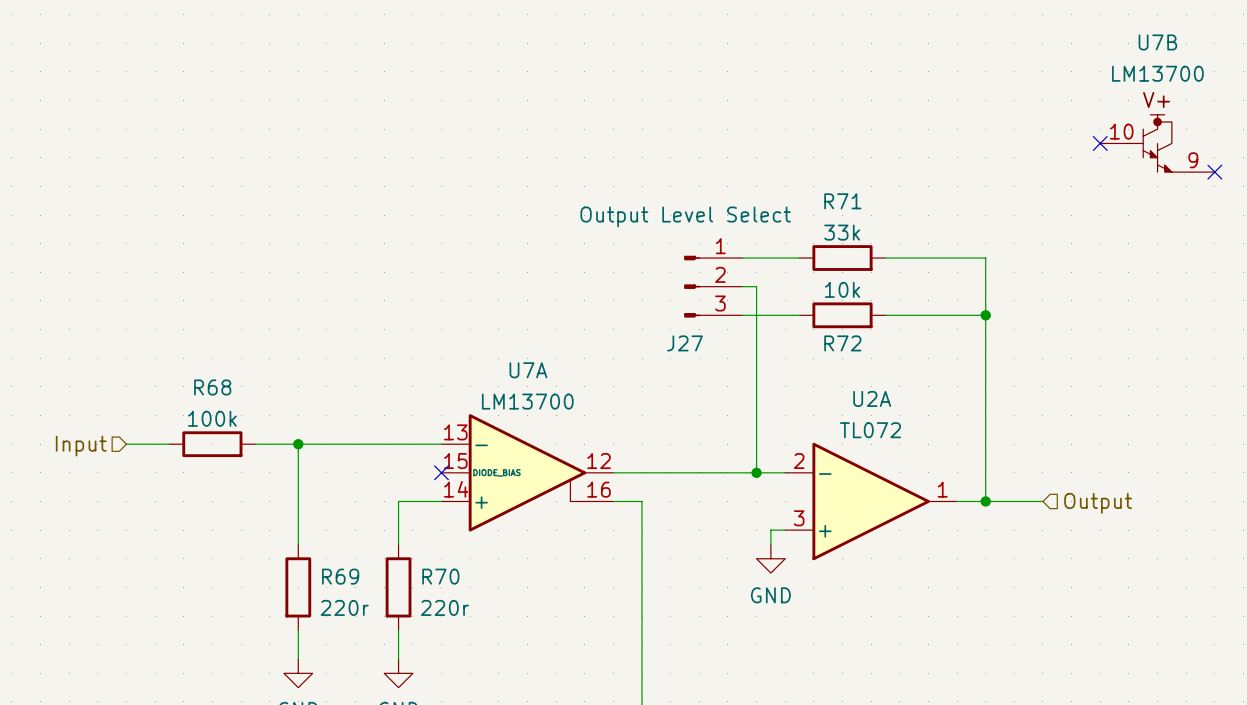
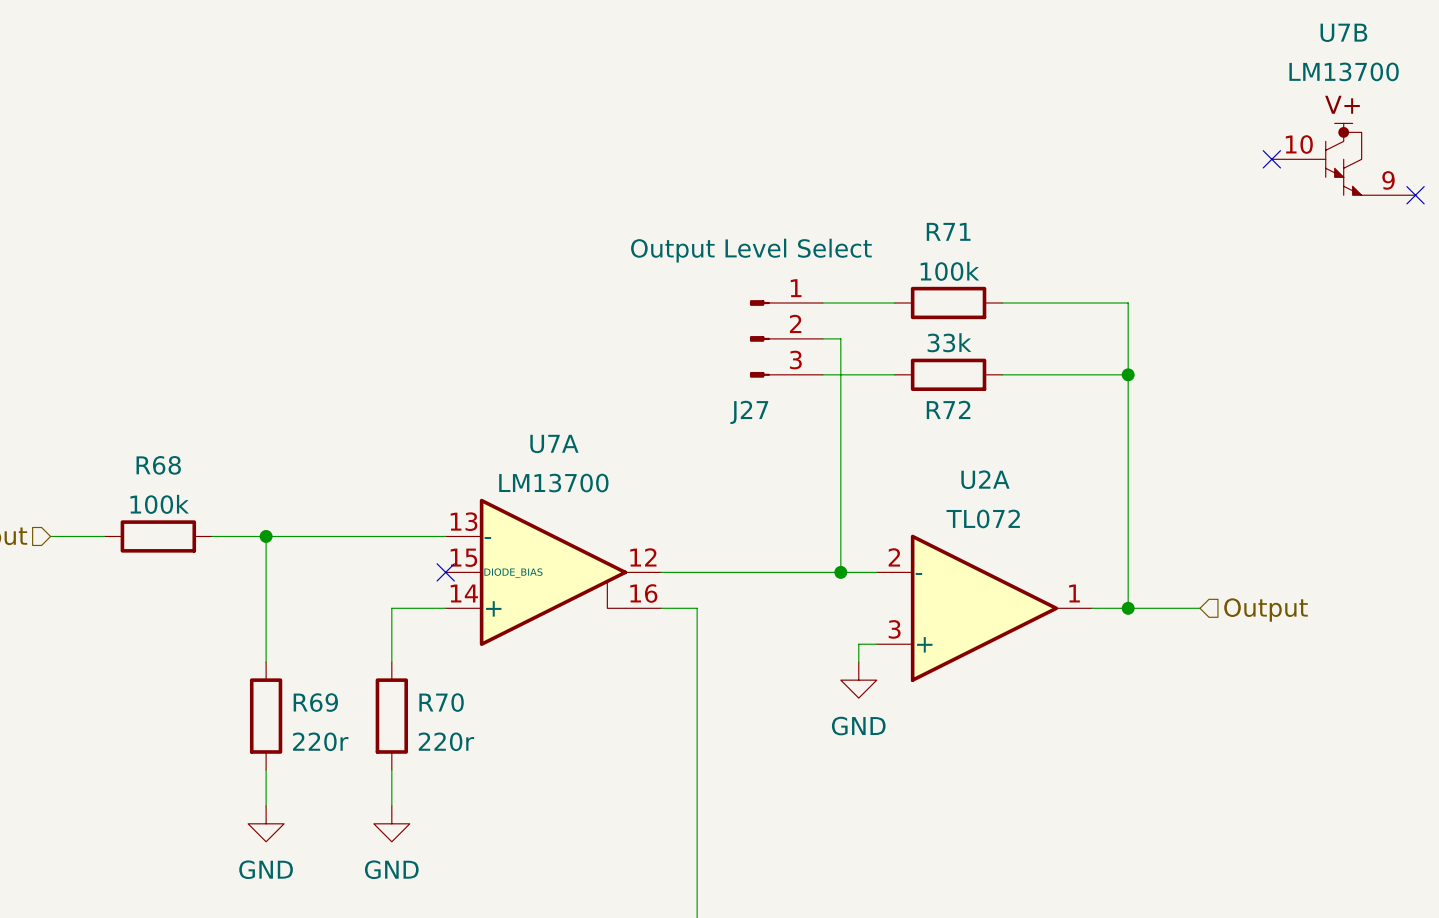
R71 value: 33k (842, 232) -> 100k (949, 271)
R72 value: 10k (842, 289) -> 33k (949, 342)

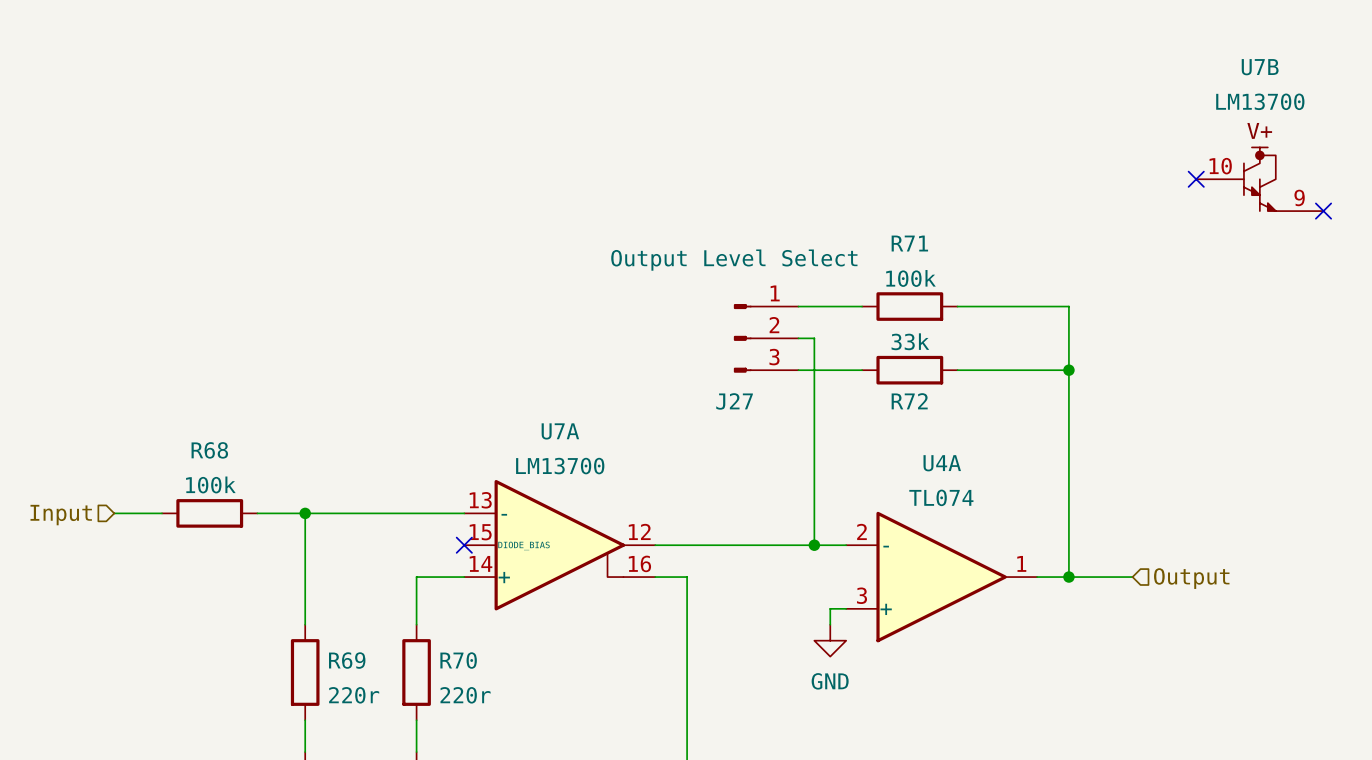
U2A name: U2A (985, 479) -> U4A (942, 463)
U2A value: TL072 (983, 518) -> TL074 (941, 497)

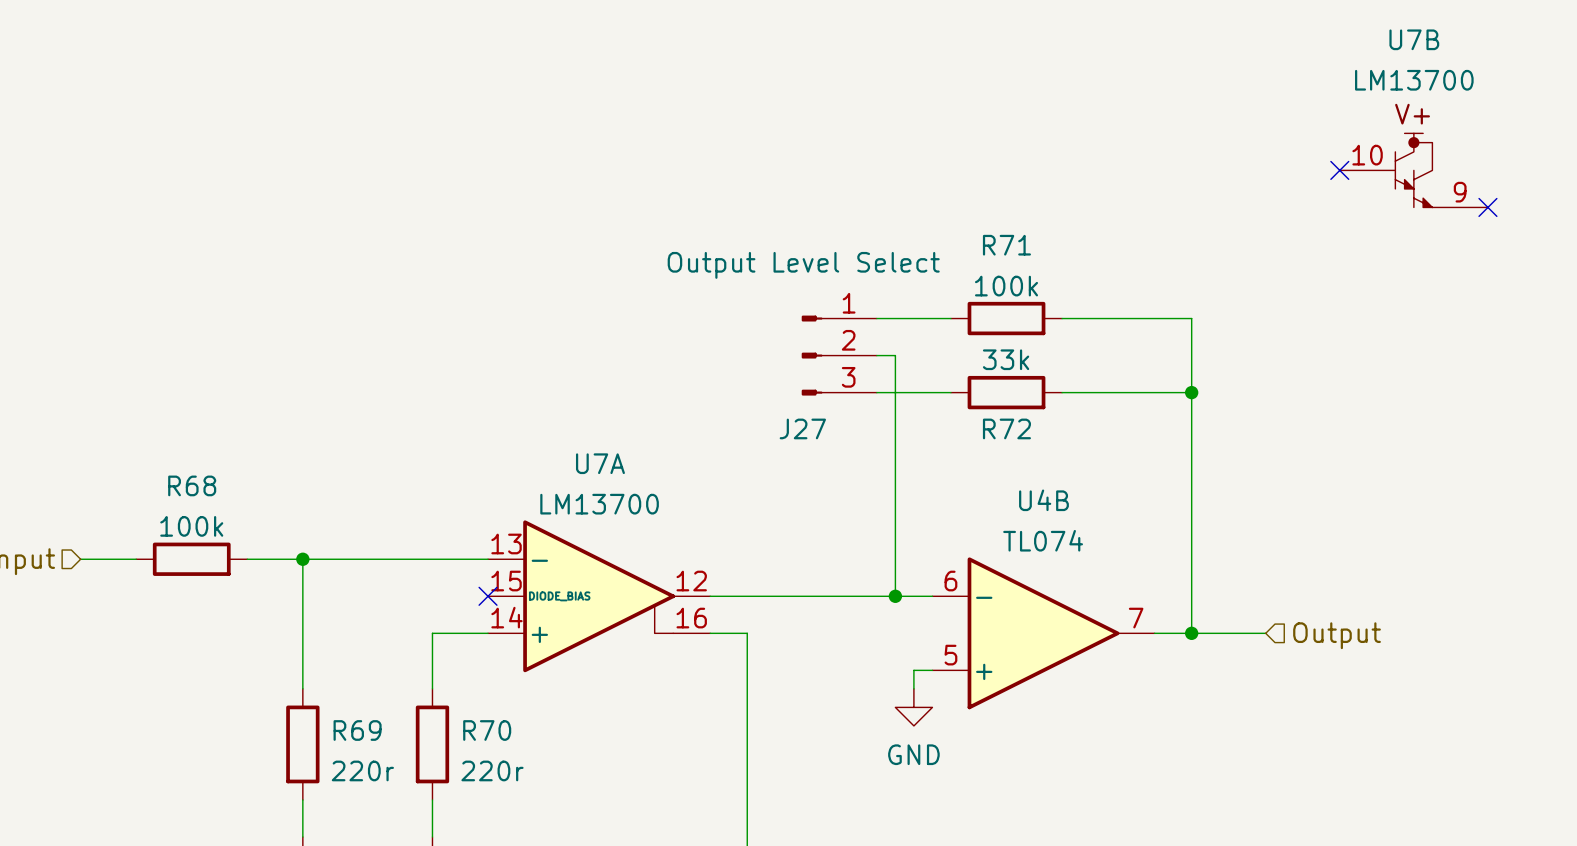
U4A name: U4A (942, 463) -> U4B (1043, 500)
U4A pin number: 2 (861, 531) -> 6 (950, 581)
U4A pin number: 1 (1021, 563) -> 7 (1136, 618)
U4A pin number: 3 (862, 595) -> 5 (950, 655)

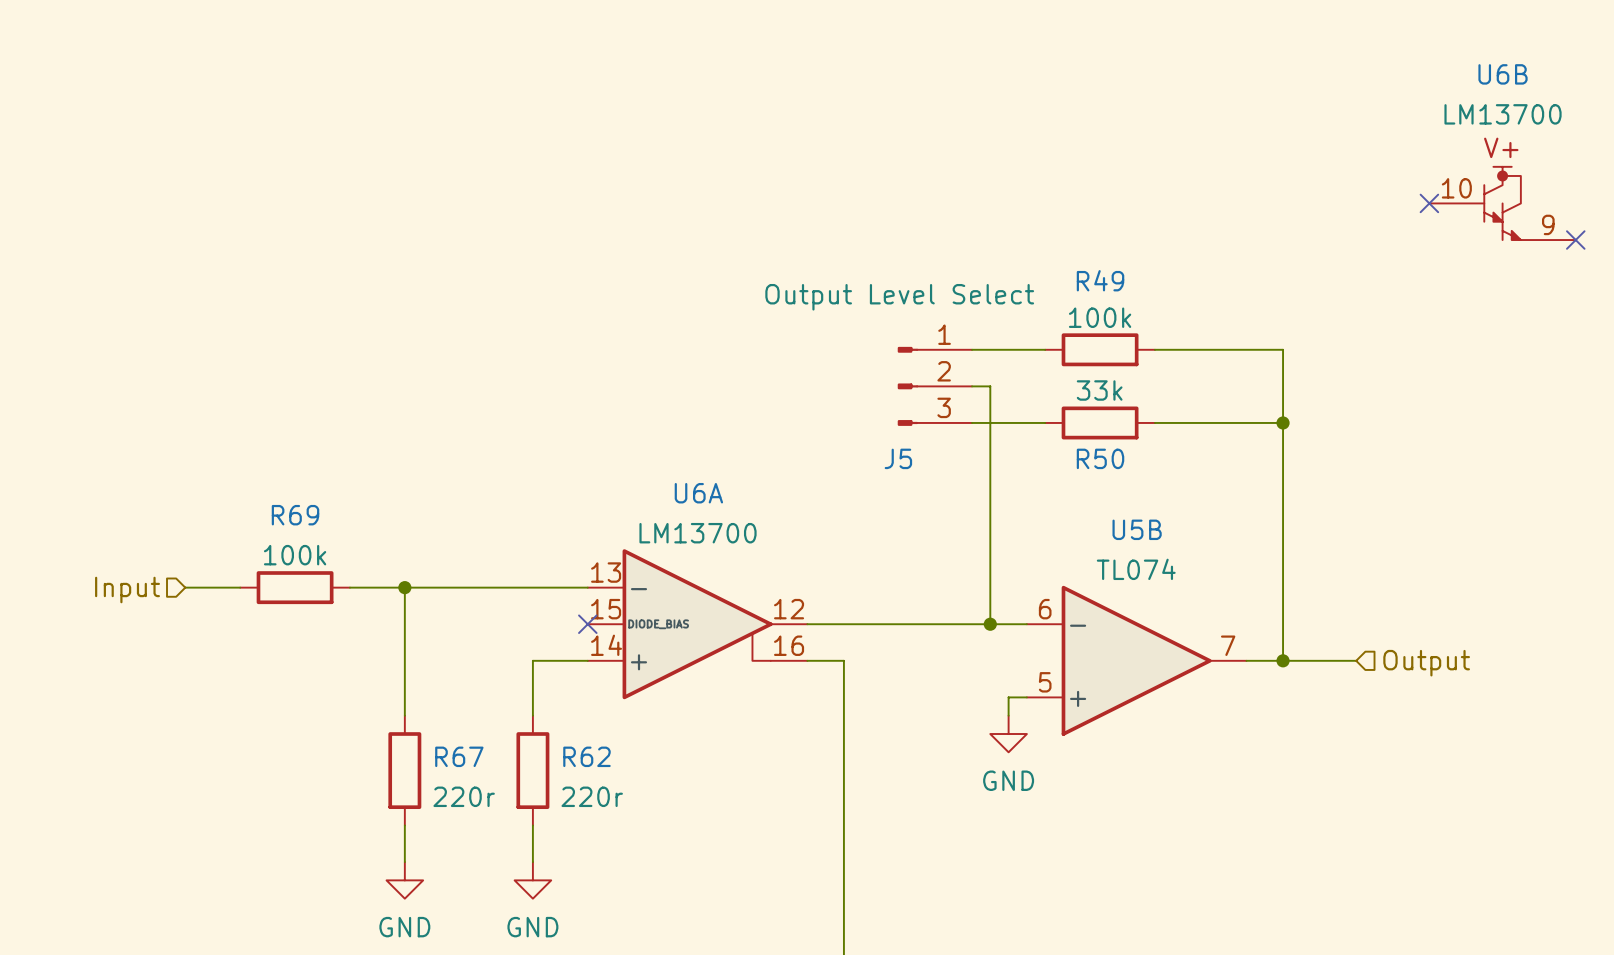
U7B name: U7B (1414, 39) -> U6B (1503, 74)
R71 name: R71 (1006, 245) -> R49 (1100, 280)
J27 name: J27 (802, 428) -> J5 (898, 458)
R72 name: R72 (1006, 428) -> R50 (1100, 458)
U7A name: U7A (600, 463) -> U6A (698, 493)
R68 name: R68 (192, 485) -> R69 (295, 515)
U4B name: U4B (1043, 500) -> U5B (1137, 529)
R69 name: R69 (357, 730) -> R67 (459, 756)
R70 name: R70 (487, 730) -> R62 (586, 756)

